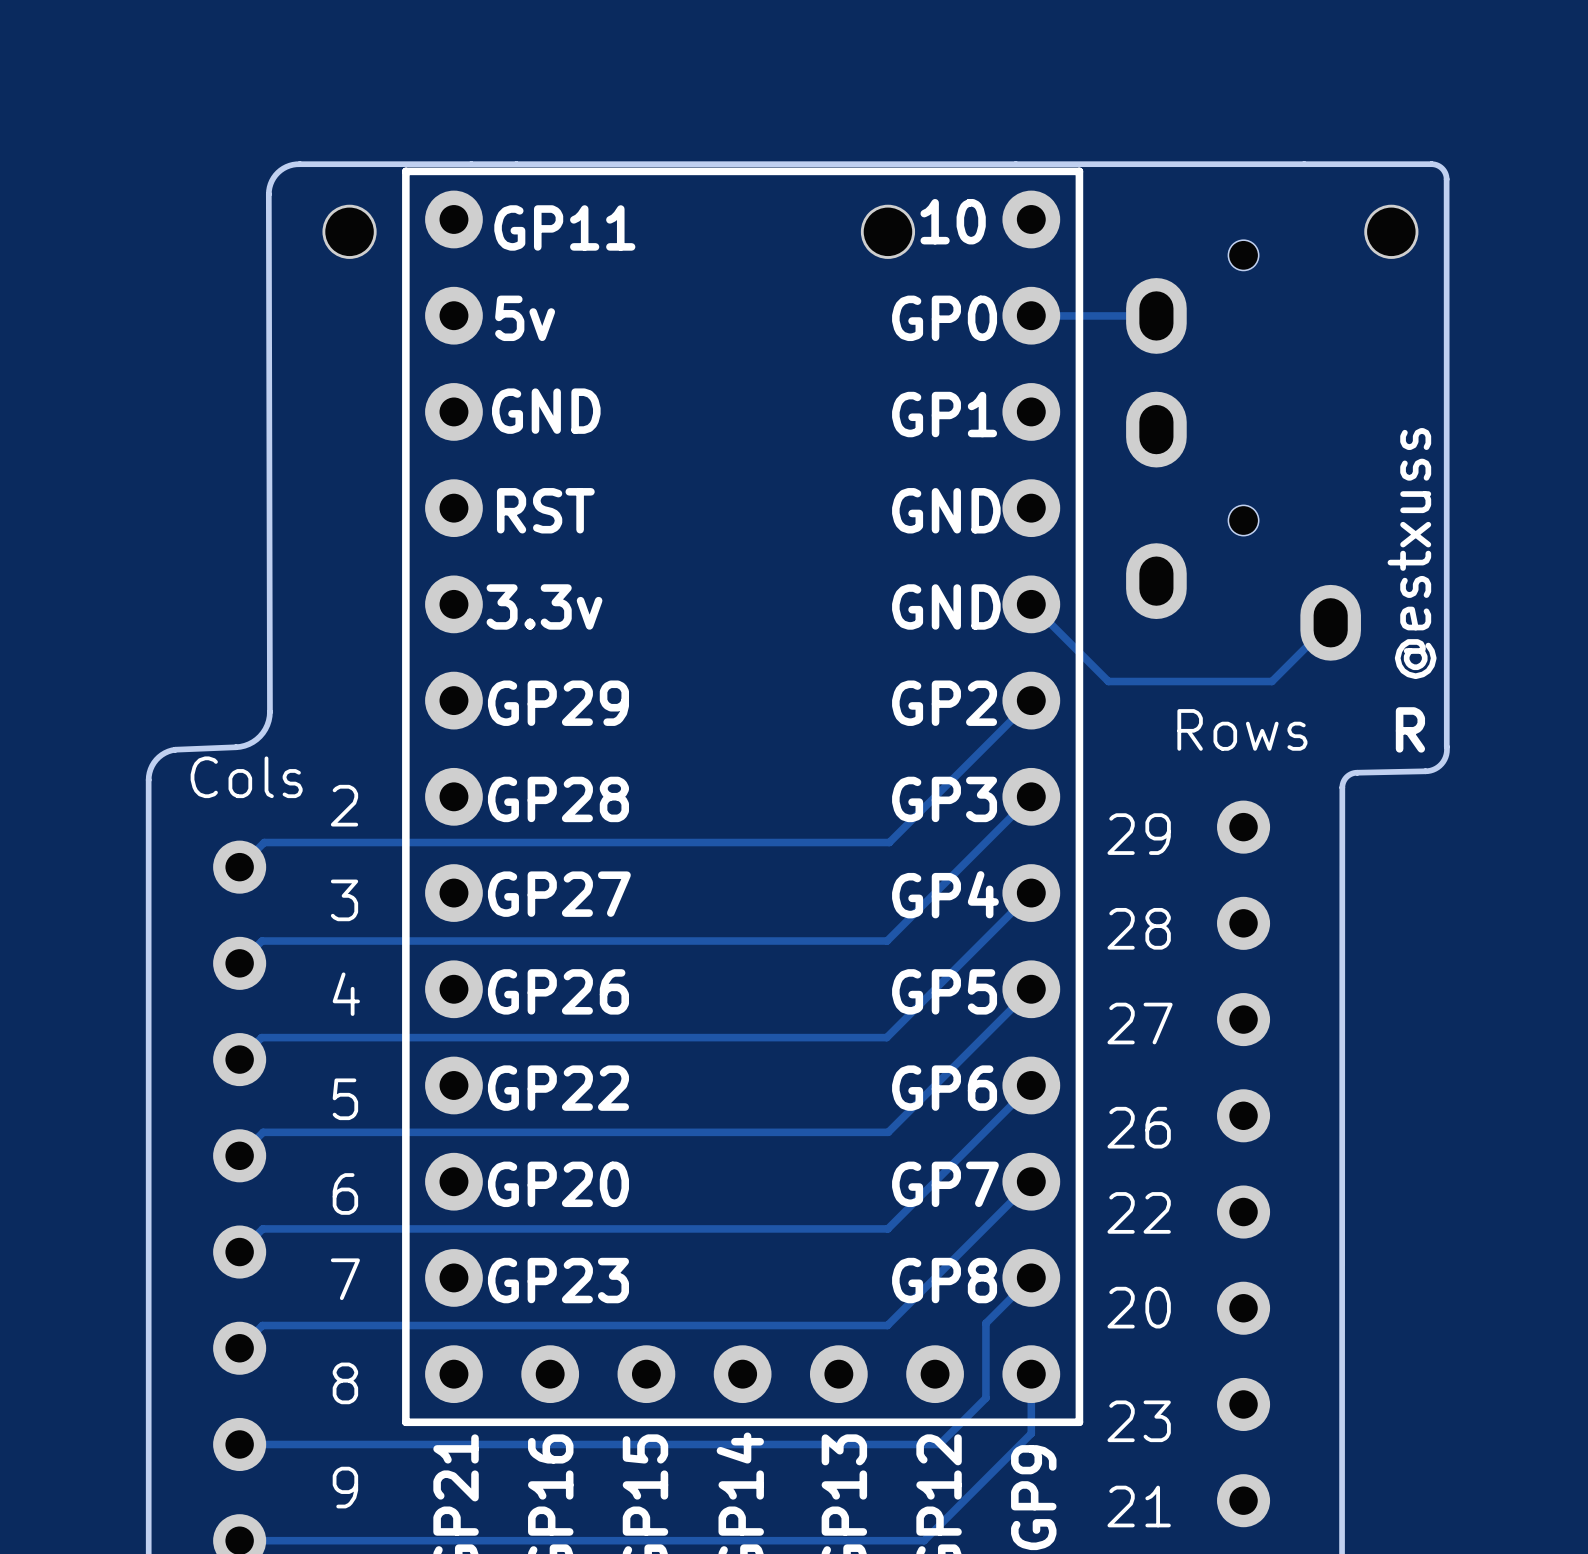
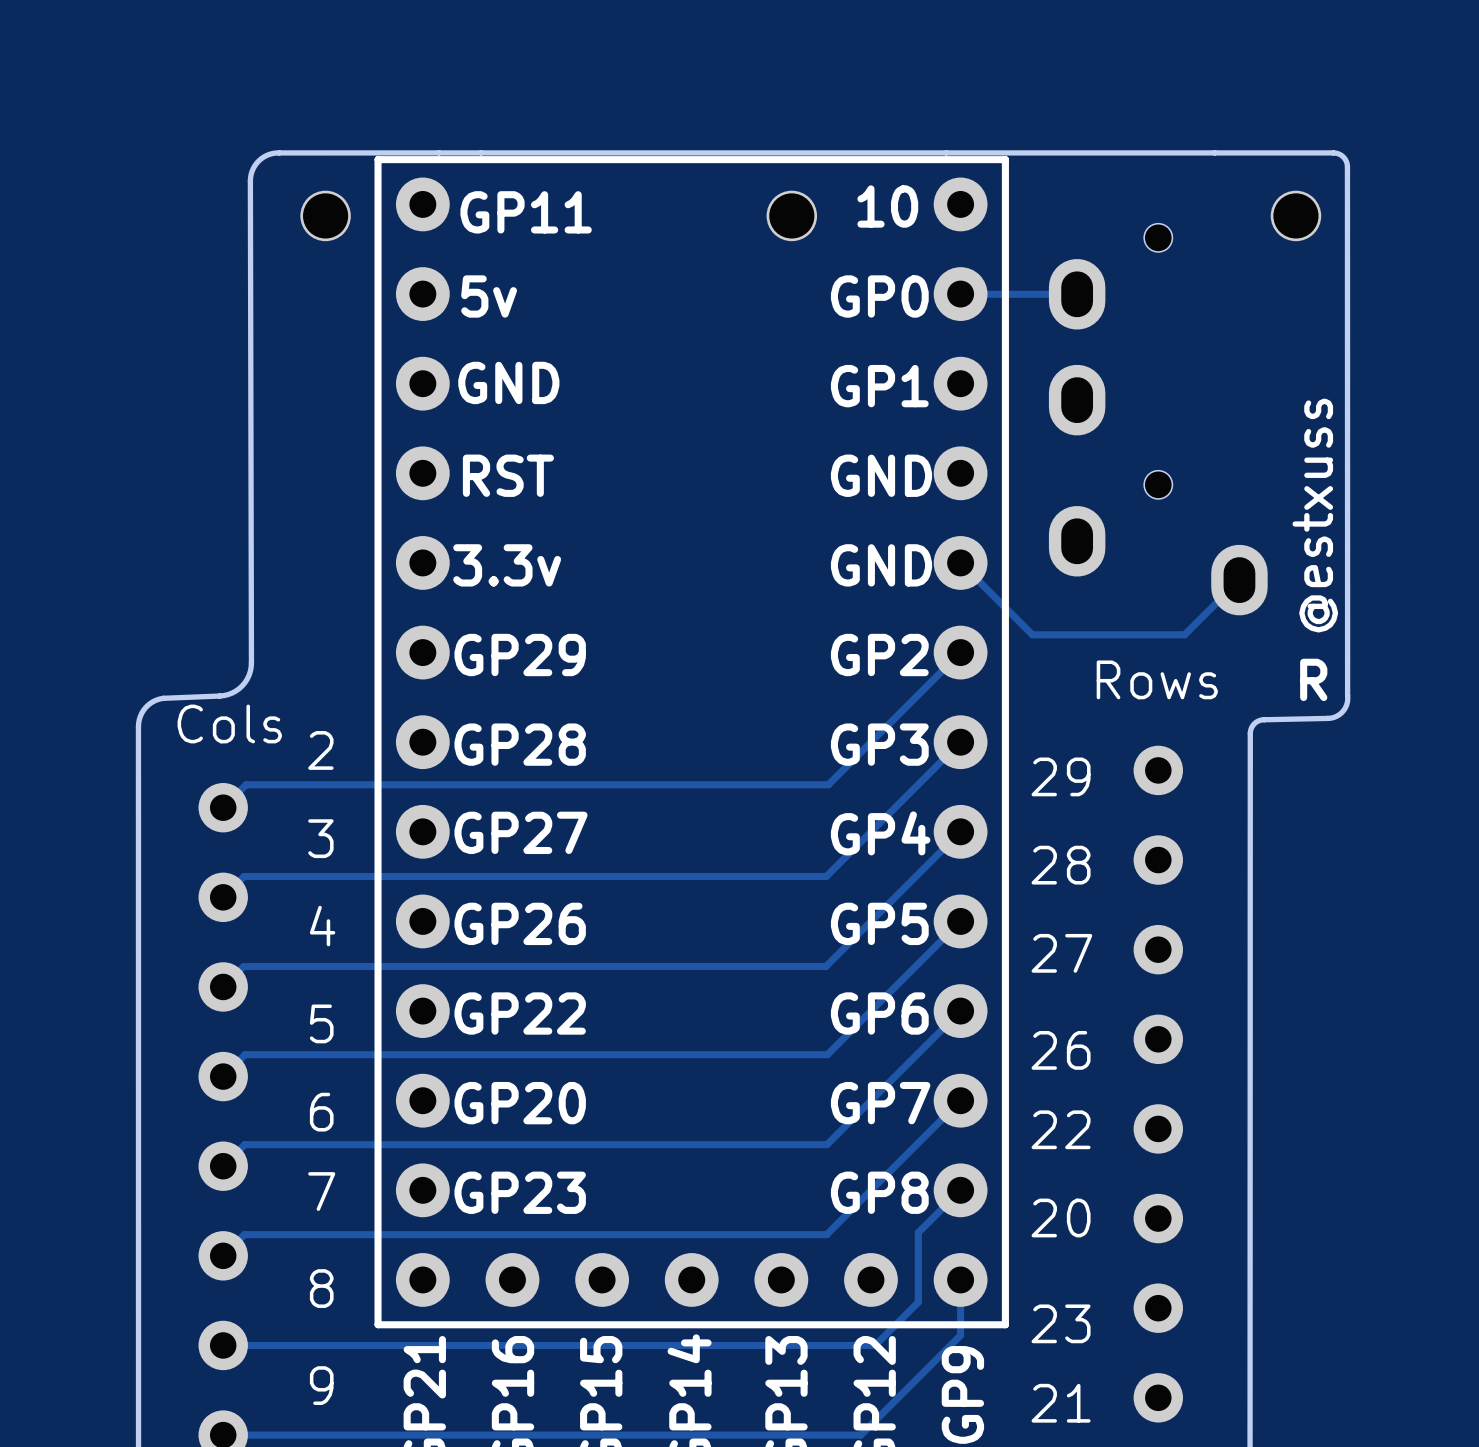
part position: (887, 231) -> (791, 215)

